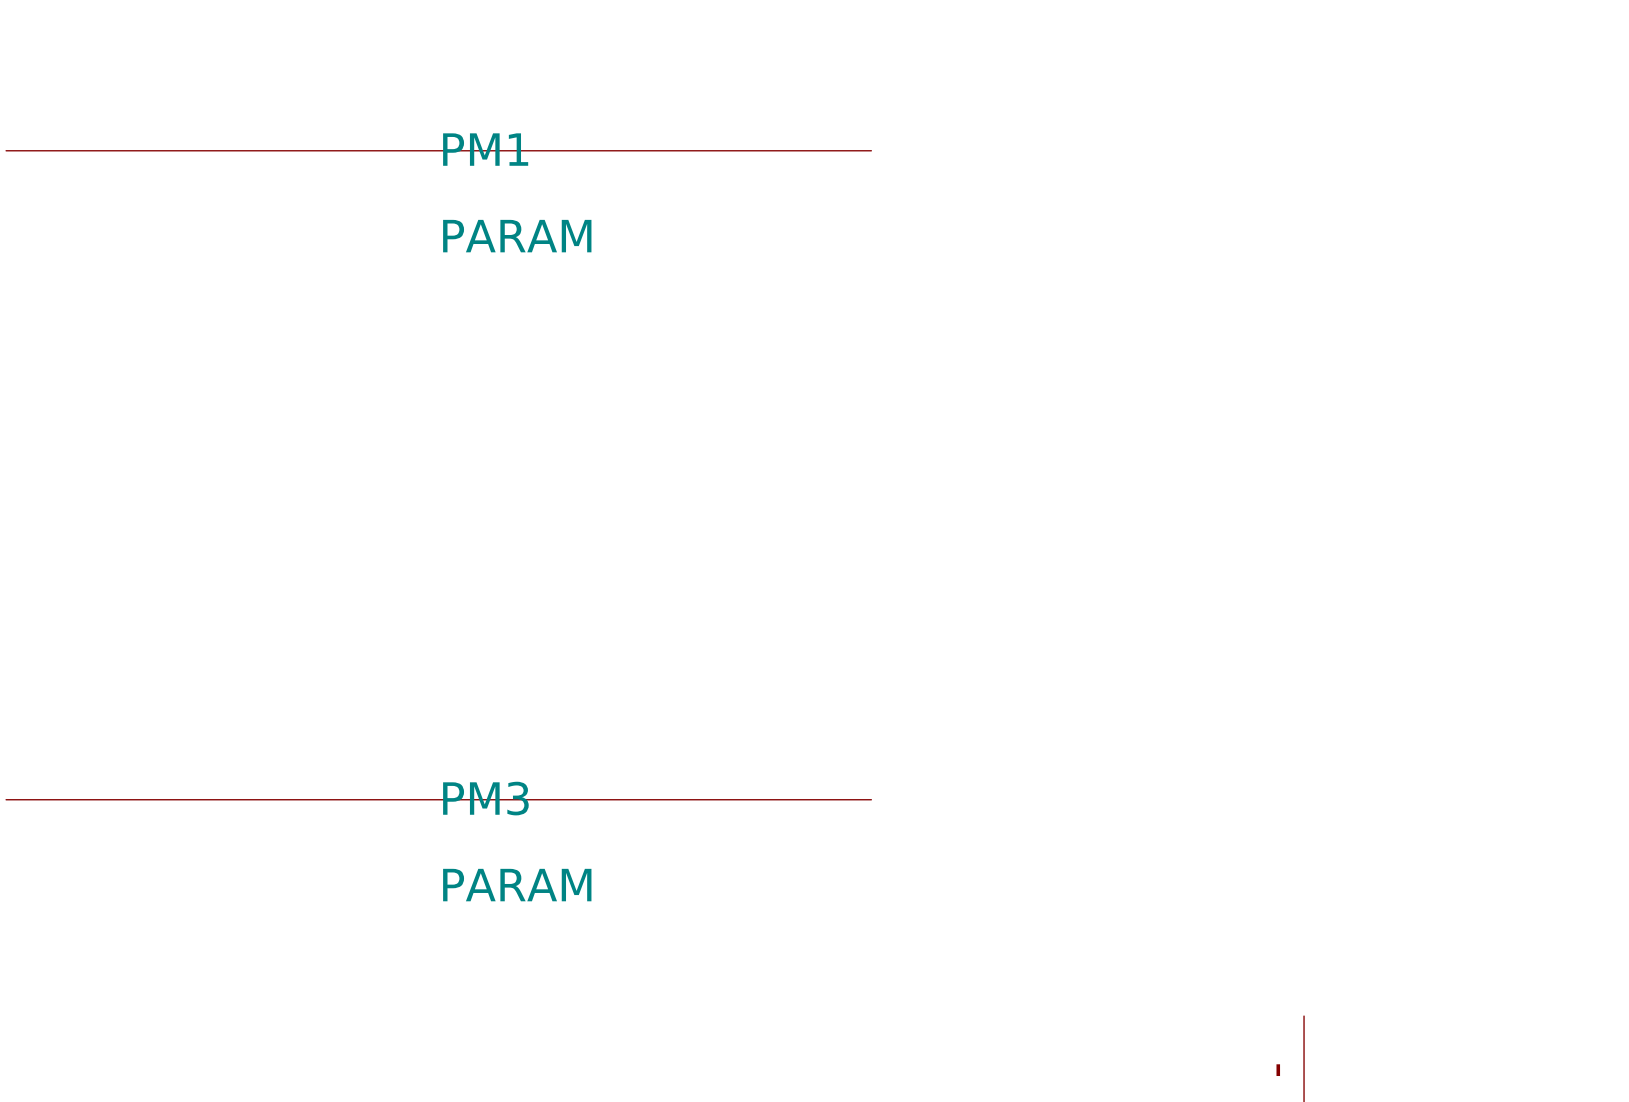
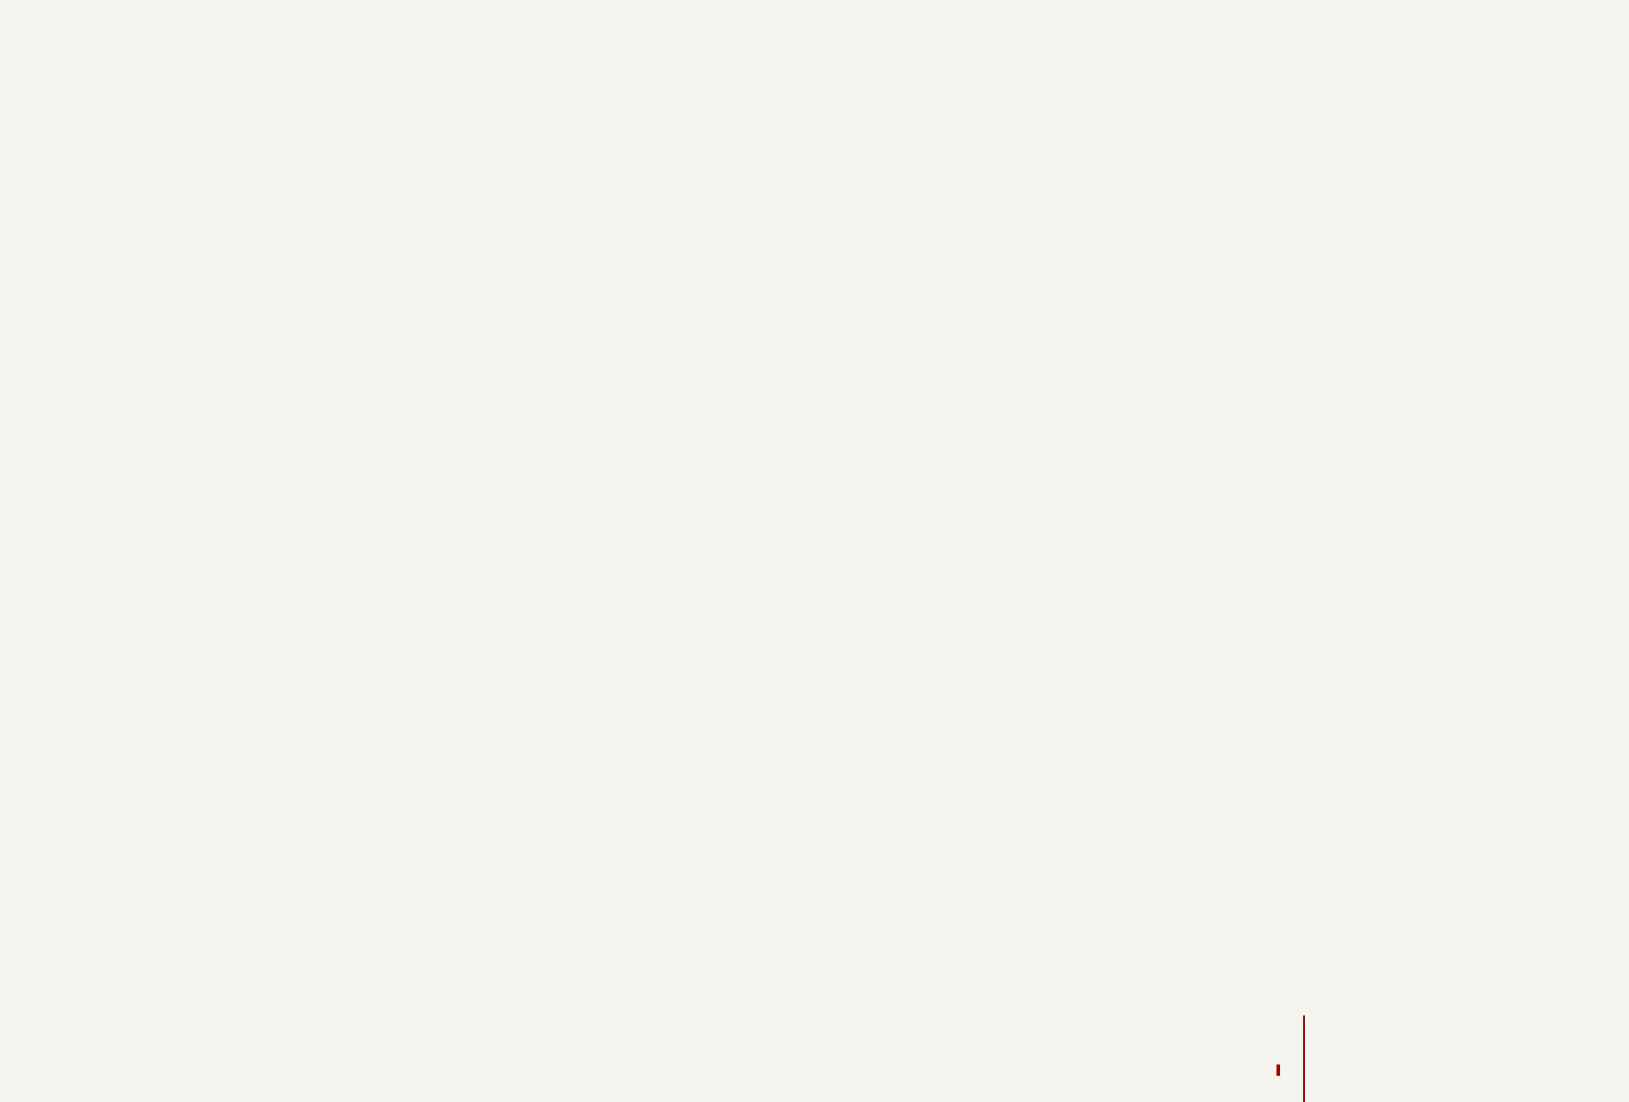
PM1: PARAM (438, 150) -> none
PM3: PARAM (438, 799) -> none

